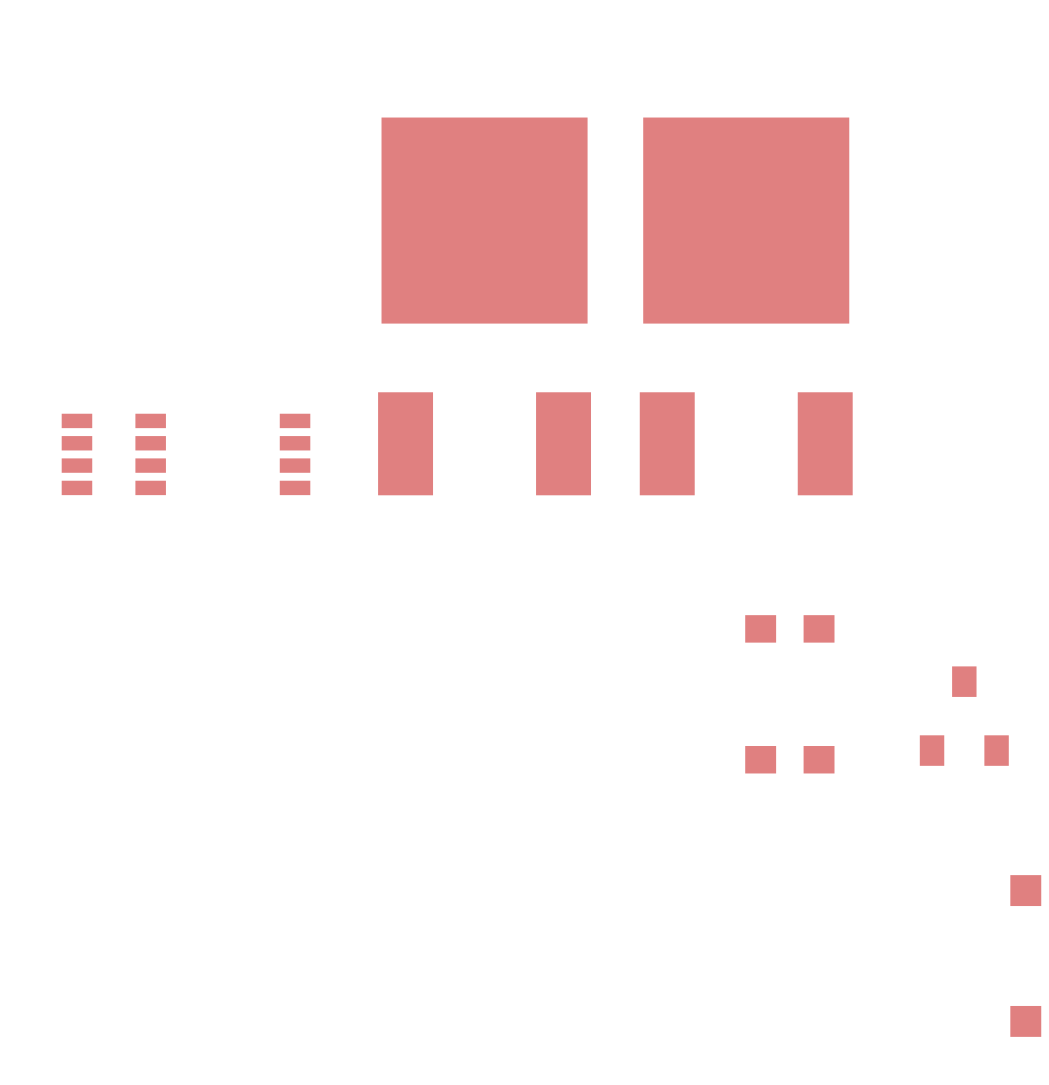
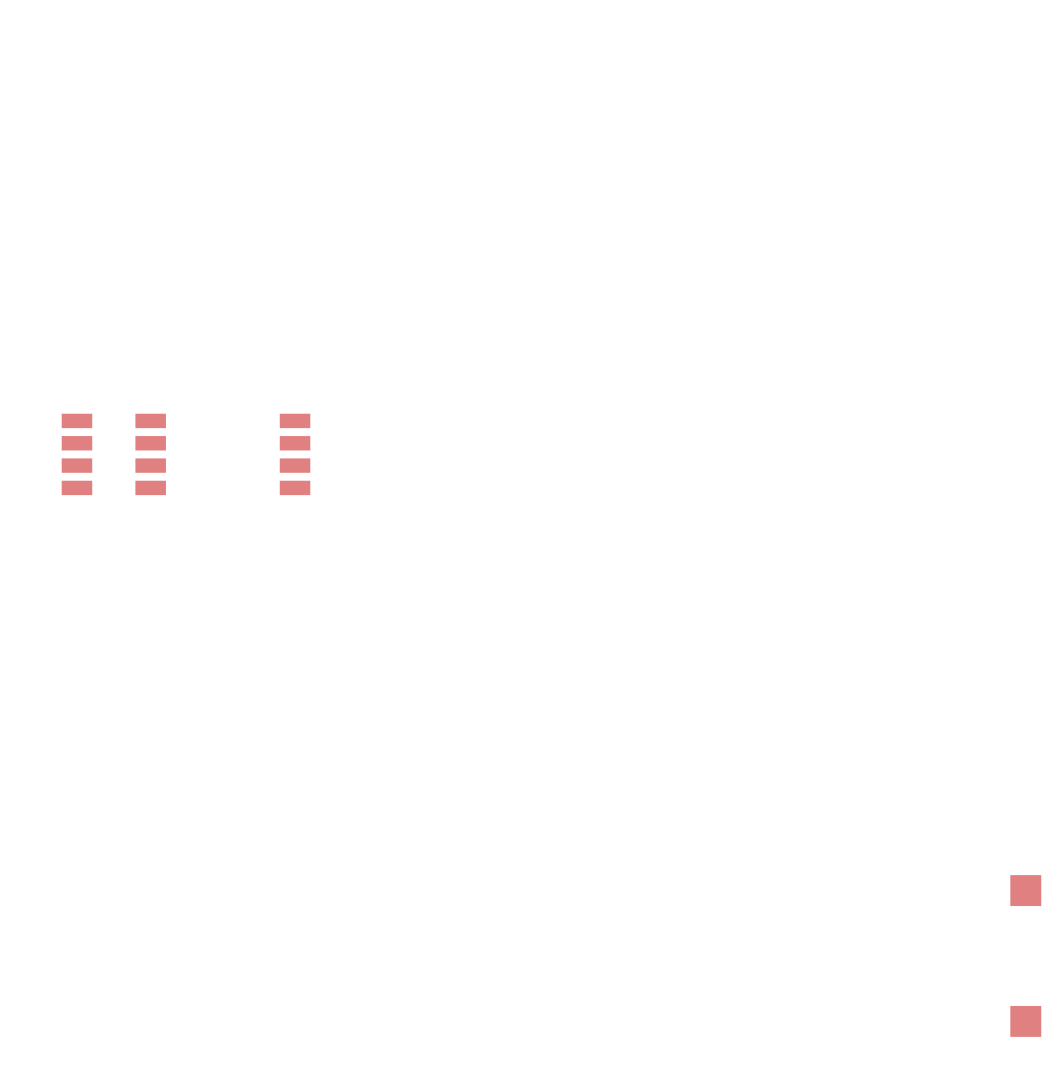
part: (484, 306) -> none
part: (746, 306) -> none
part: (789, 628) -> none
part: (964, 716) -> none
part: (789, 759) -> none

